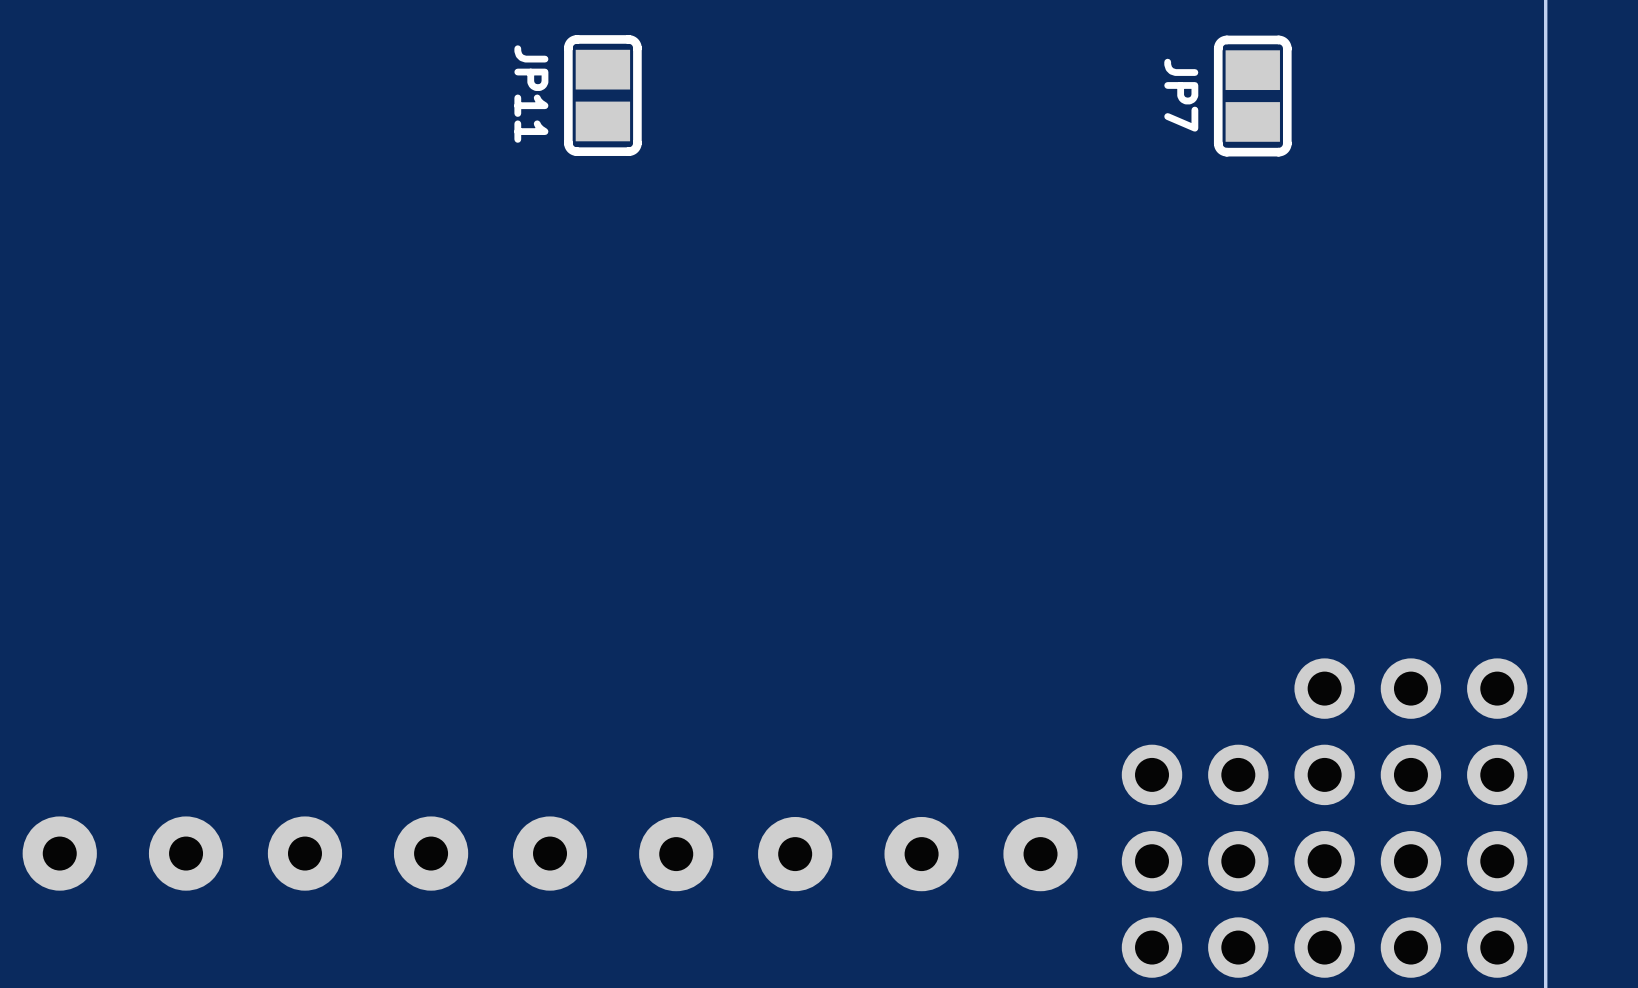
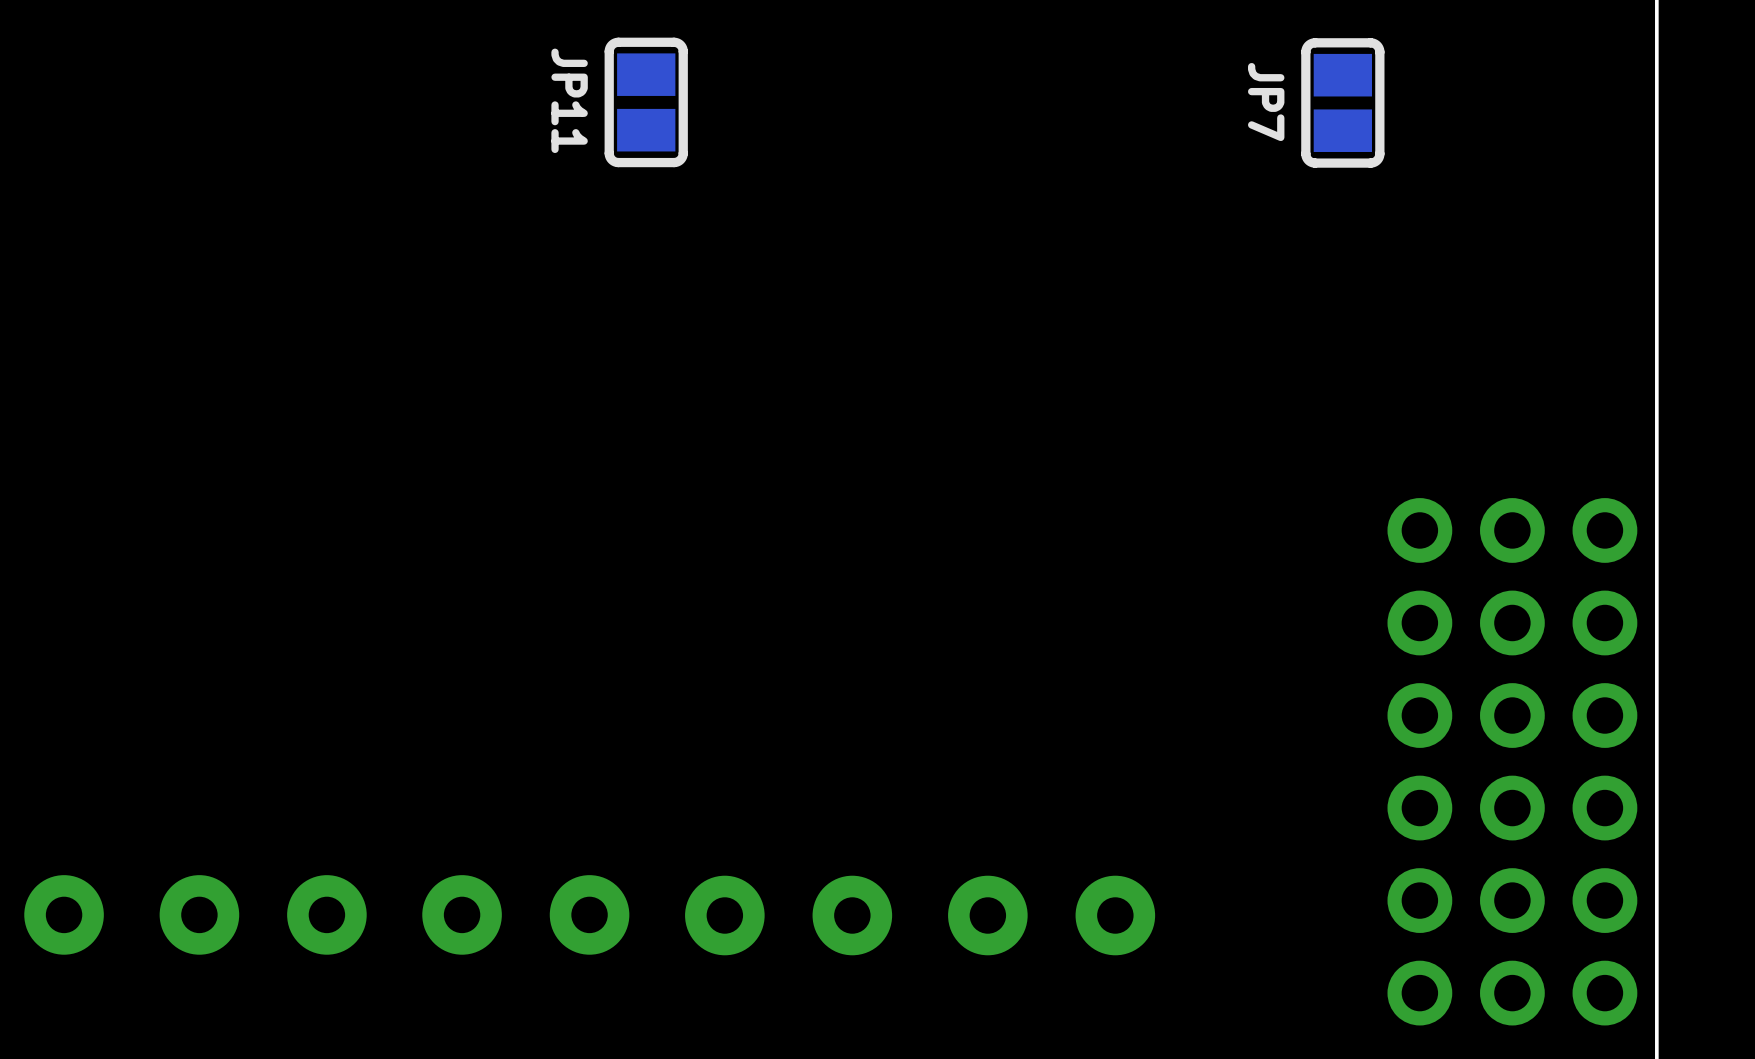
part position: (1410, 818) -> (1512, 669)
part rotation: 0° (1195, 861) -> 90° clockwise (1512, 946)
part position: (1195, 861) -> (1512, 946)

